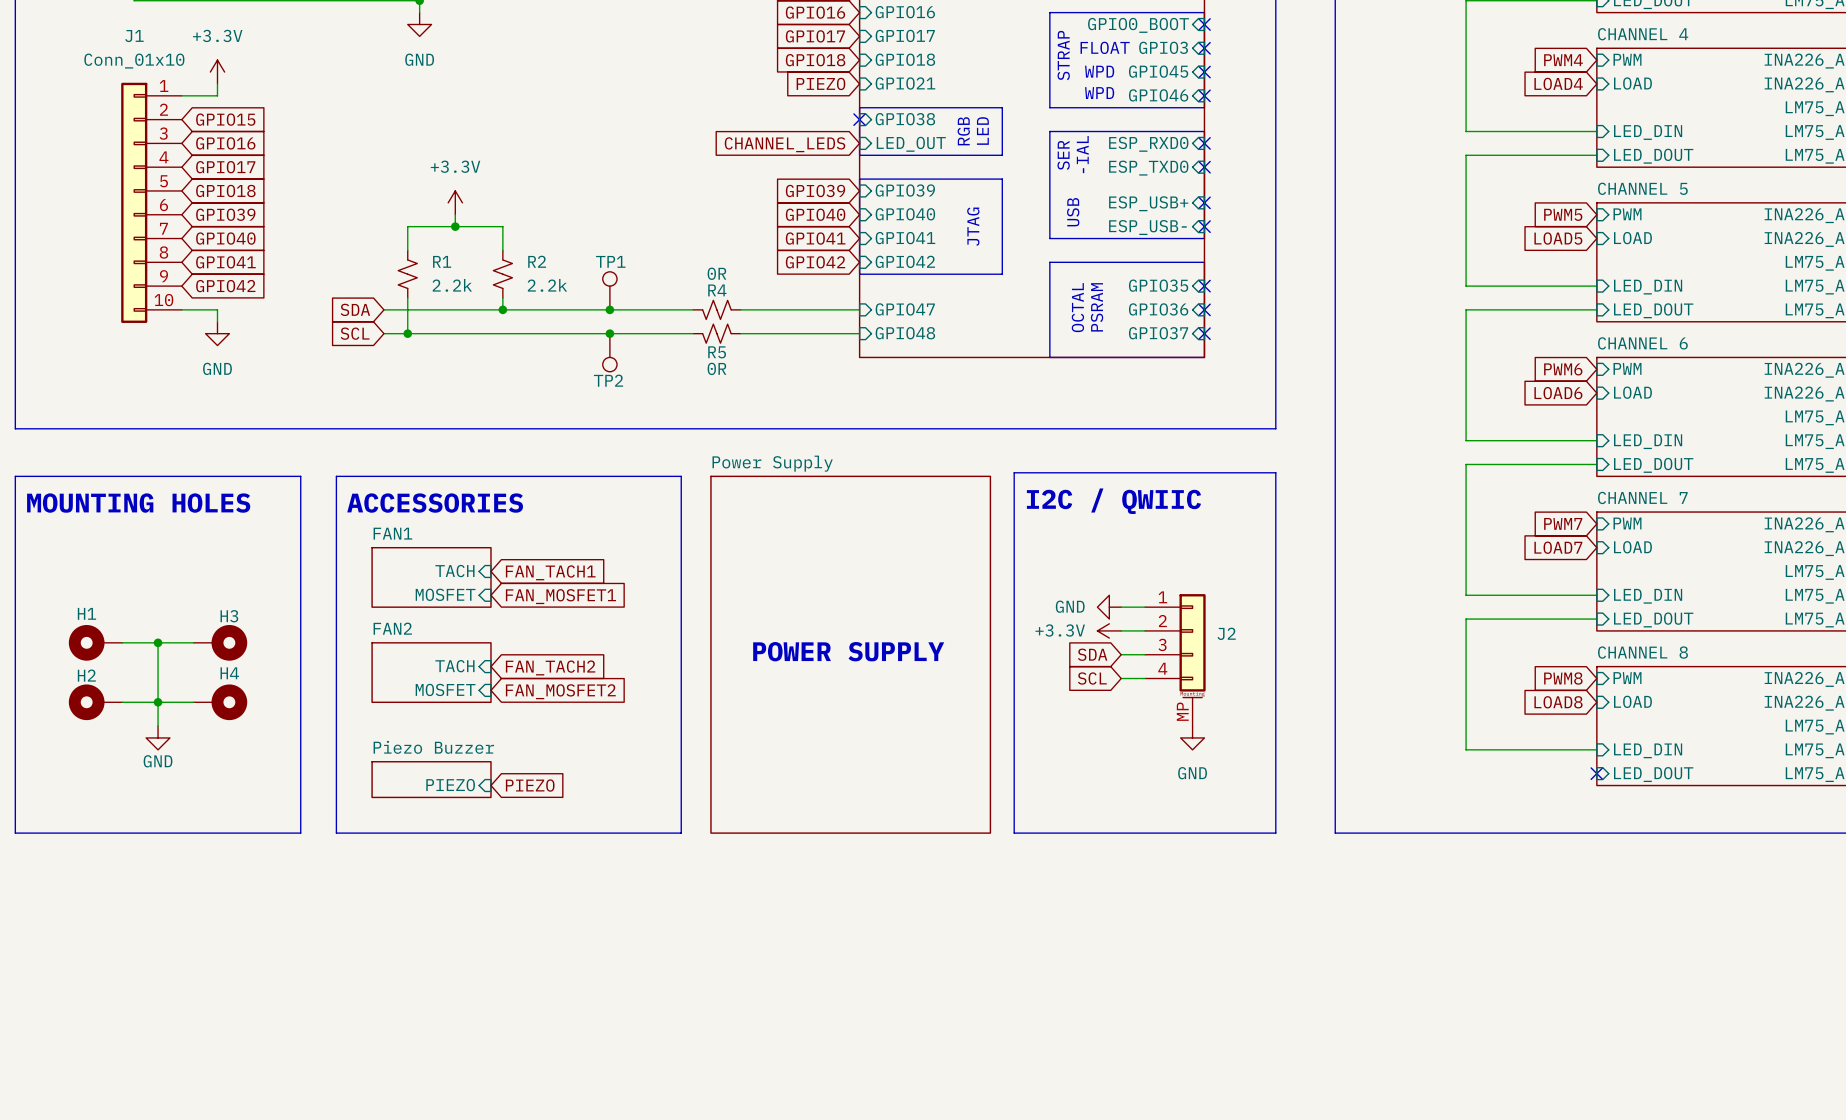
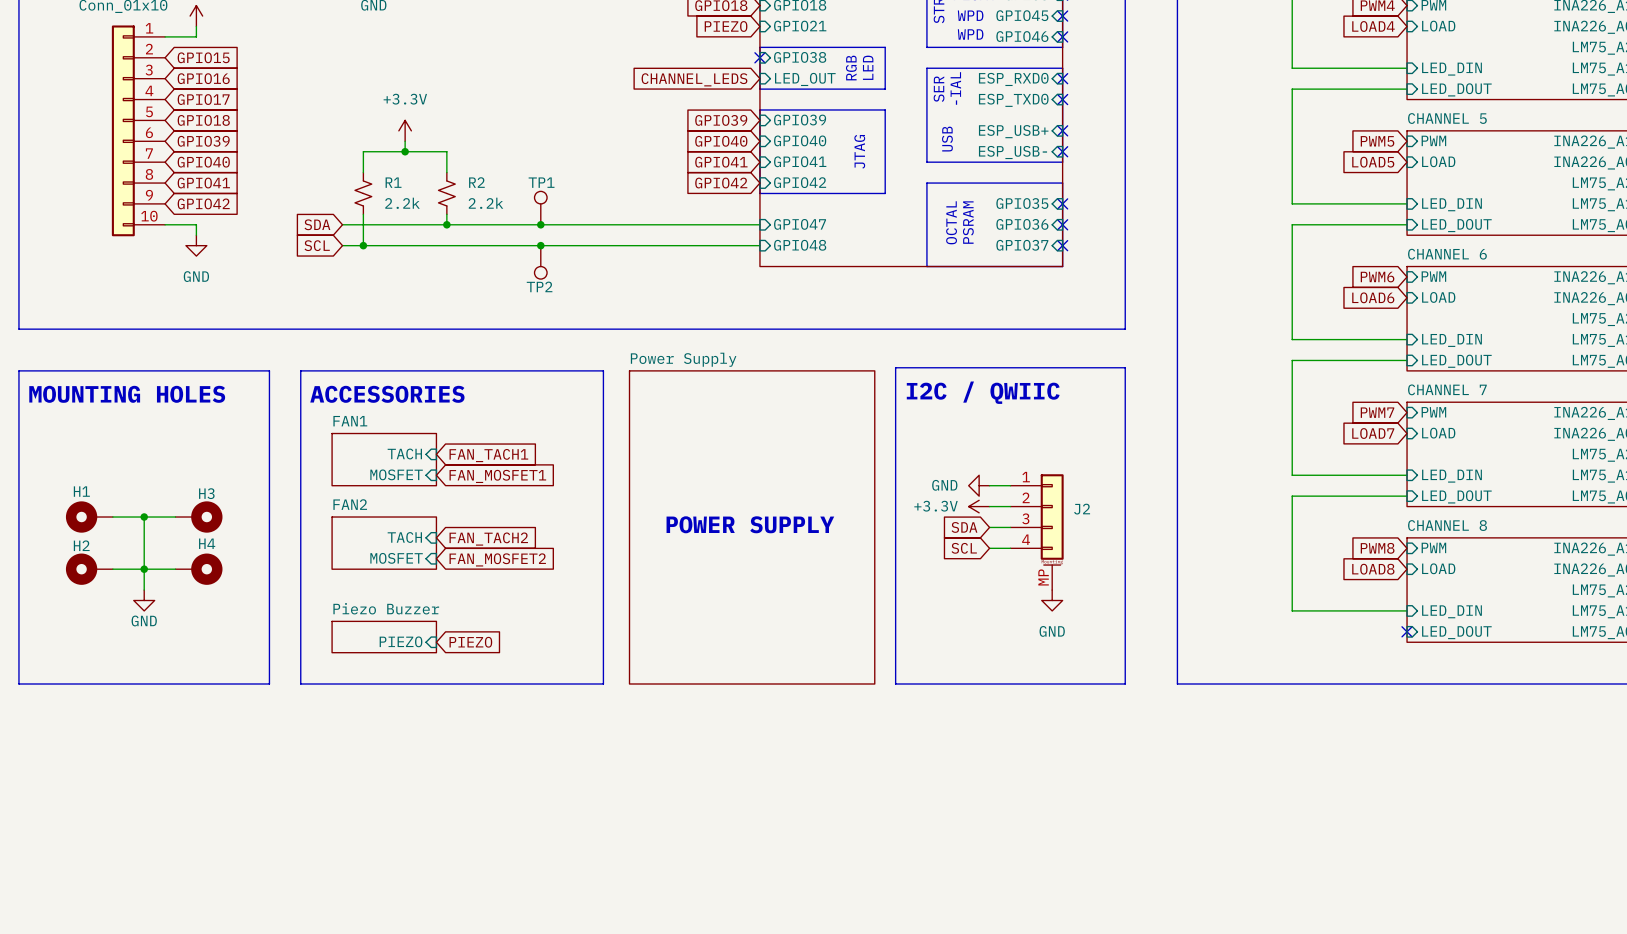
R4: 0R (716, 309) -> none
R5: 0R (716, 333) -> none

